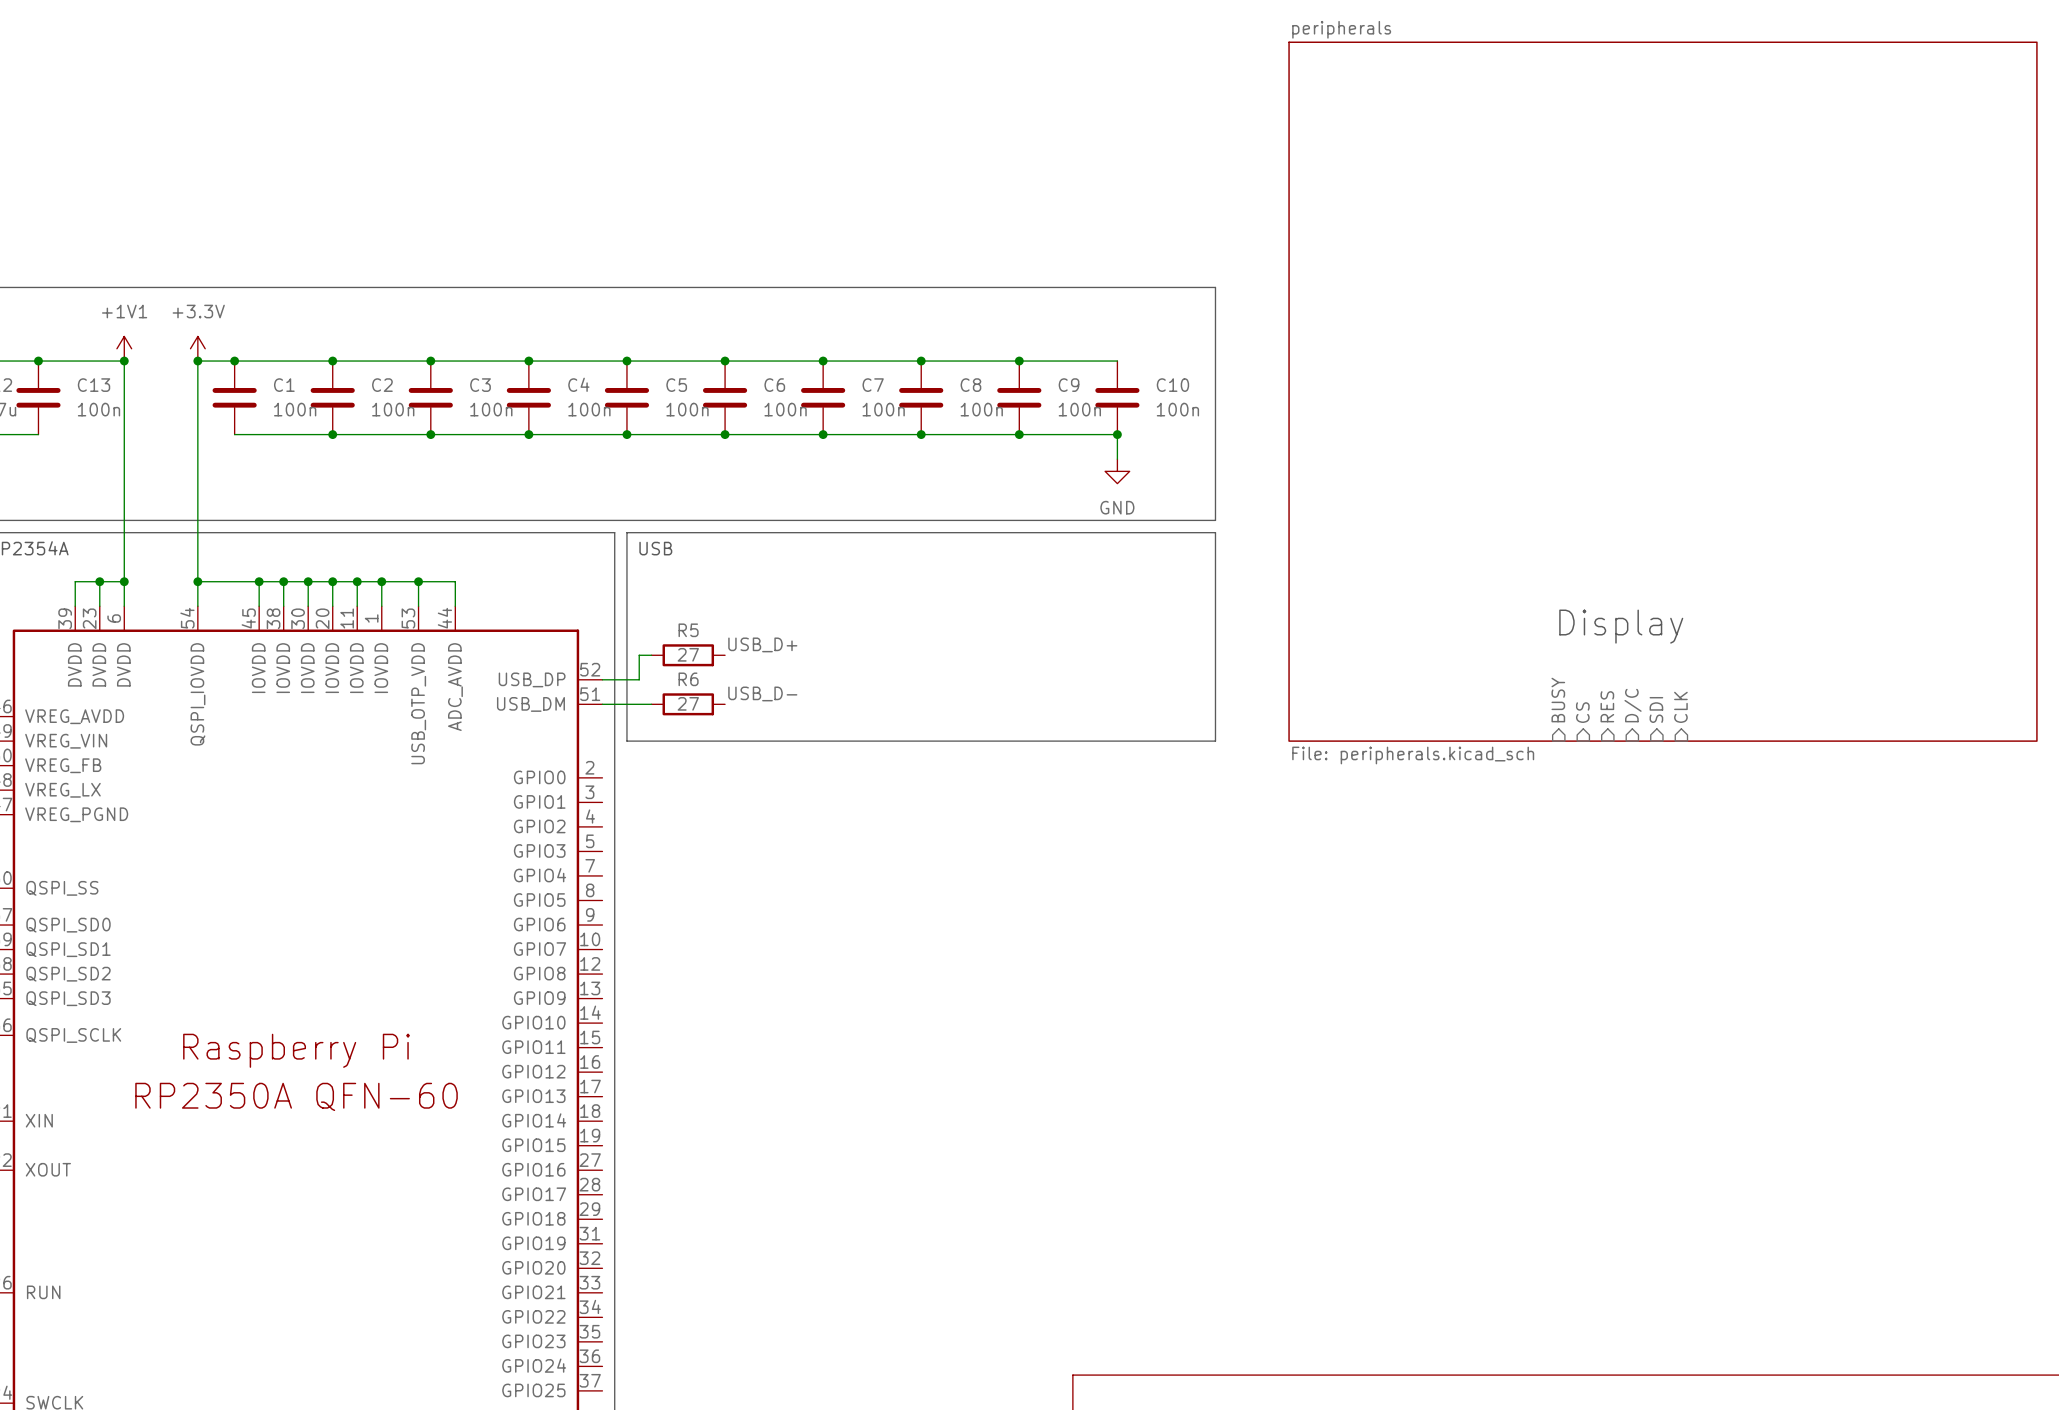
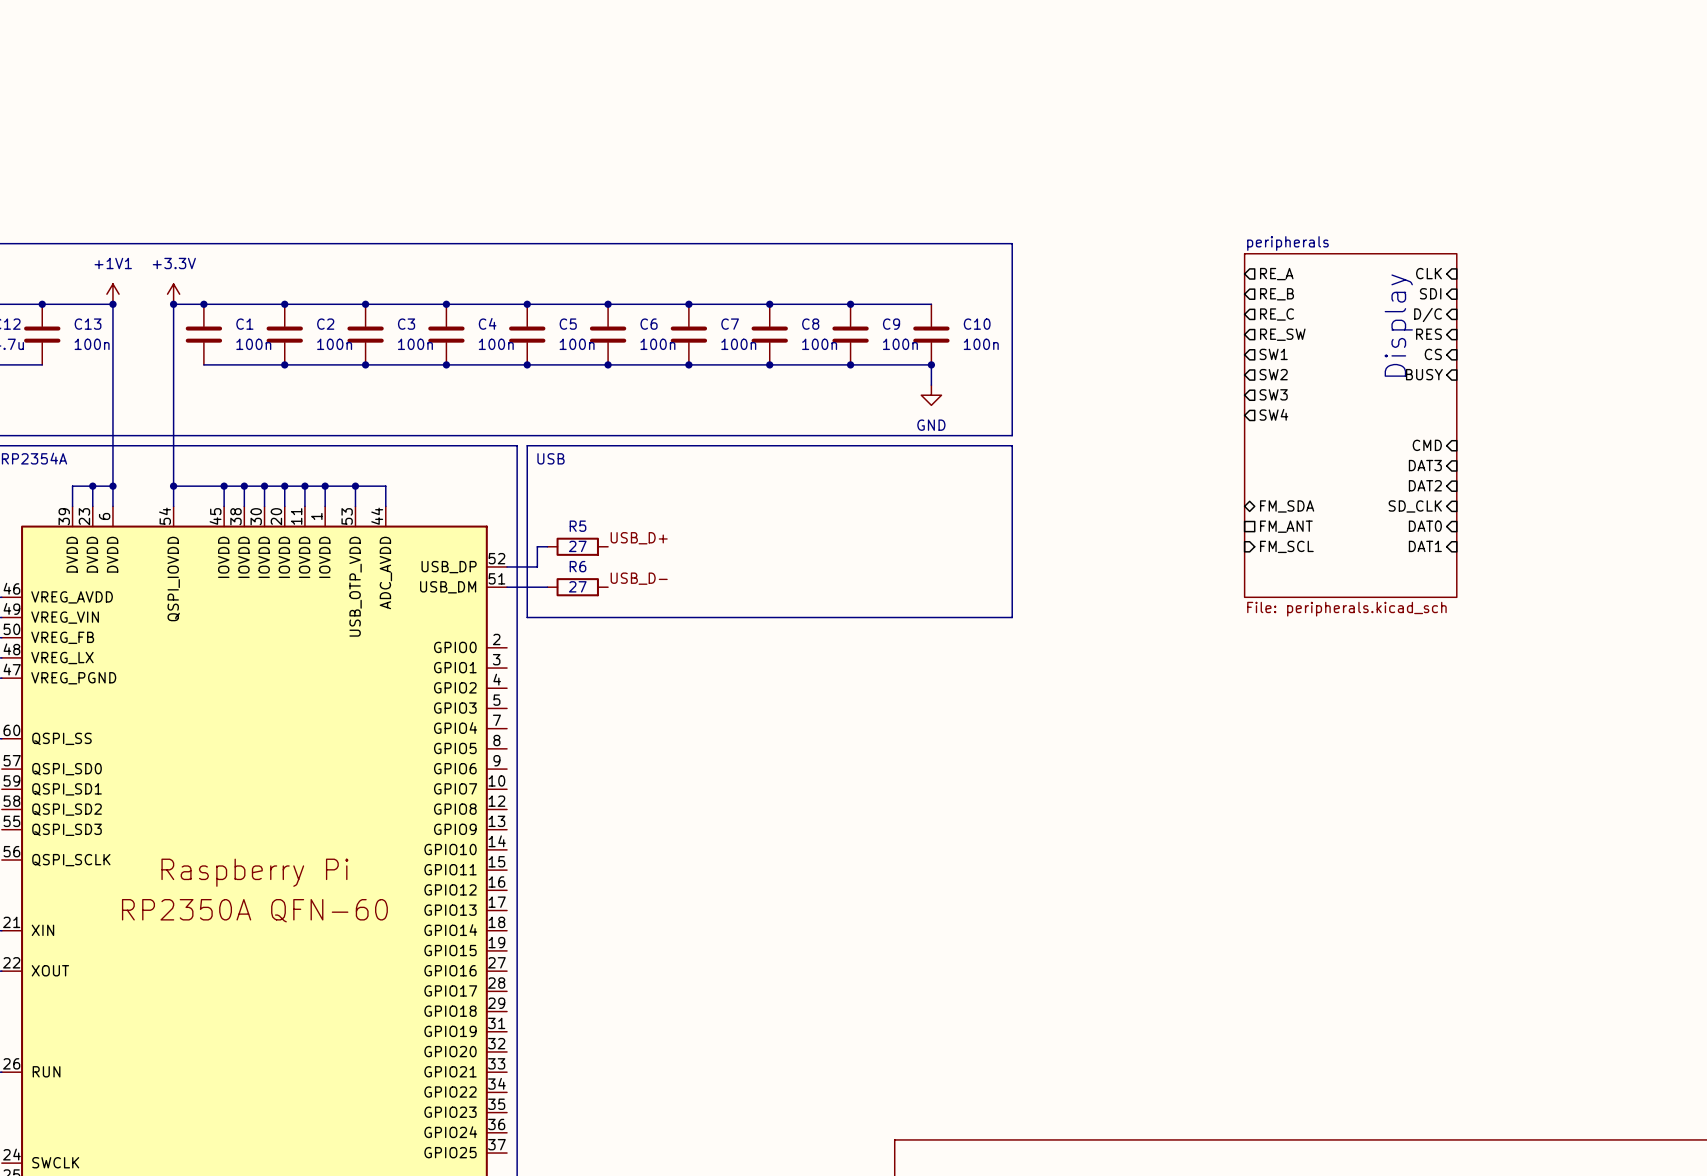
sheet pin: none -> CLK (1428, 273)
sheet pin: none -> RE_A (1276, 274)
sheet pin: none -> RE_B (1277, 294)
sheet pin: none -> SDI (1430, 293)
sheet pin: none -> RE_C (1277, 314)
sheet pin: none -> D/C (1428, 314)
text: none -> Display (1398, 325)
sheet peripherals: File: peripherals.kicad_sch (1662, 391) -> none
sheet pin: none -> RE_SW (1282, 334)
sheet pin: none -> RES (1428, 334)
sheet pin: none -> SW1 (1273, 354)
sheet pin: none -> CS (1433, 354)
sheet pin: none -> SW2 (1273, 374)
sheet pin: none -> BUSY (1424, 374)
sheet pin: none -> SW3 (1273, 394)
sheet pin: none -> SW4 (1273, 414)
sheet peripherals: none -> File: peripherals.kicad_sch (1350, 425)
sheet pin: none -> CMD (1427, 445)
sheet pin: none -> DAT3 (1425, 465)
sheet pin: none -> DAT2 (1425, 485)
sheet pin: none -> FM_SDA (1287, 506)
sheet pin: none -> SD_CLK (1415, 506)
text: Display (1621, 626) -> none
sheet pin: none -> FM_ANT (1286, 526)
sheet pin: none -> DAT0 (1425, 526)
sheet pin: none -> DAT1 (1425, 546)
sheet pin: none -> FM_SCL (1286, 546)
sheet pin: BUSY (1558, 700) -> none
sheet pin: D/C (1633, 705) -> none
sheet pin: RES (1607, 706) -> none
sheet pin: CLK (1680, 707) -> none
sheet pin: SDI (1656, 709) -> none
sheet pin: CS (1582, 712) -> none

